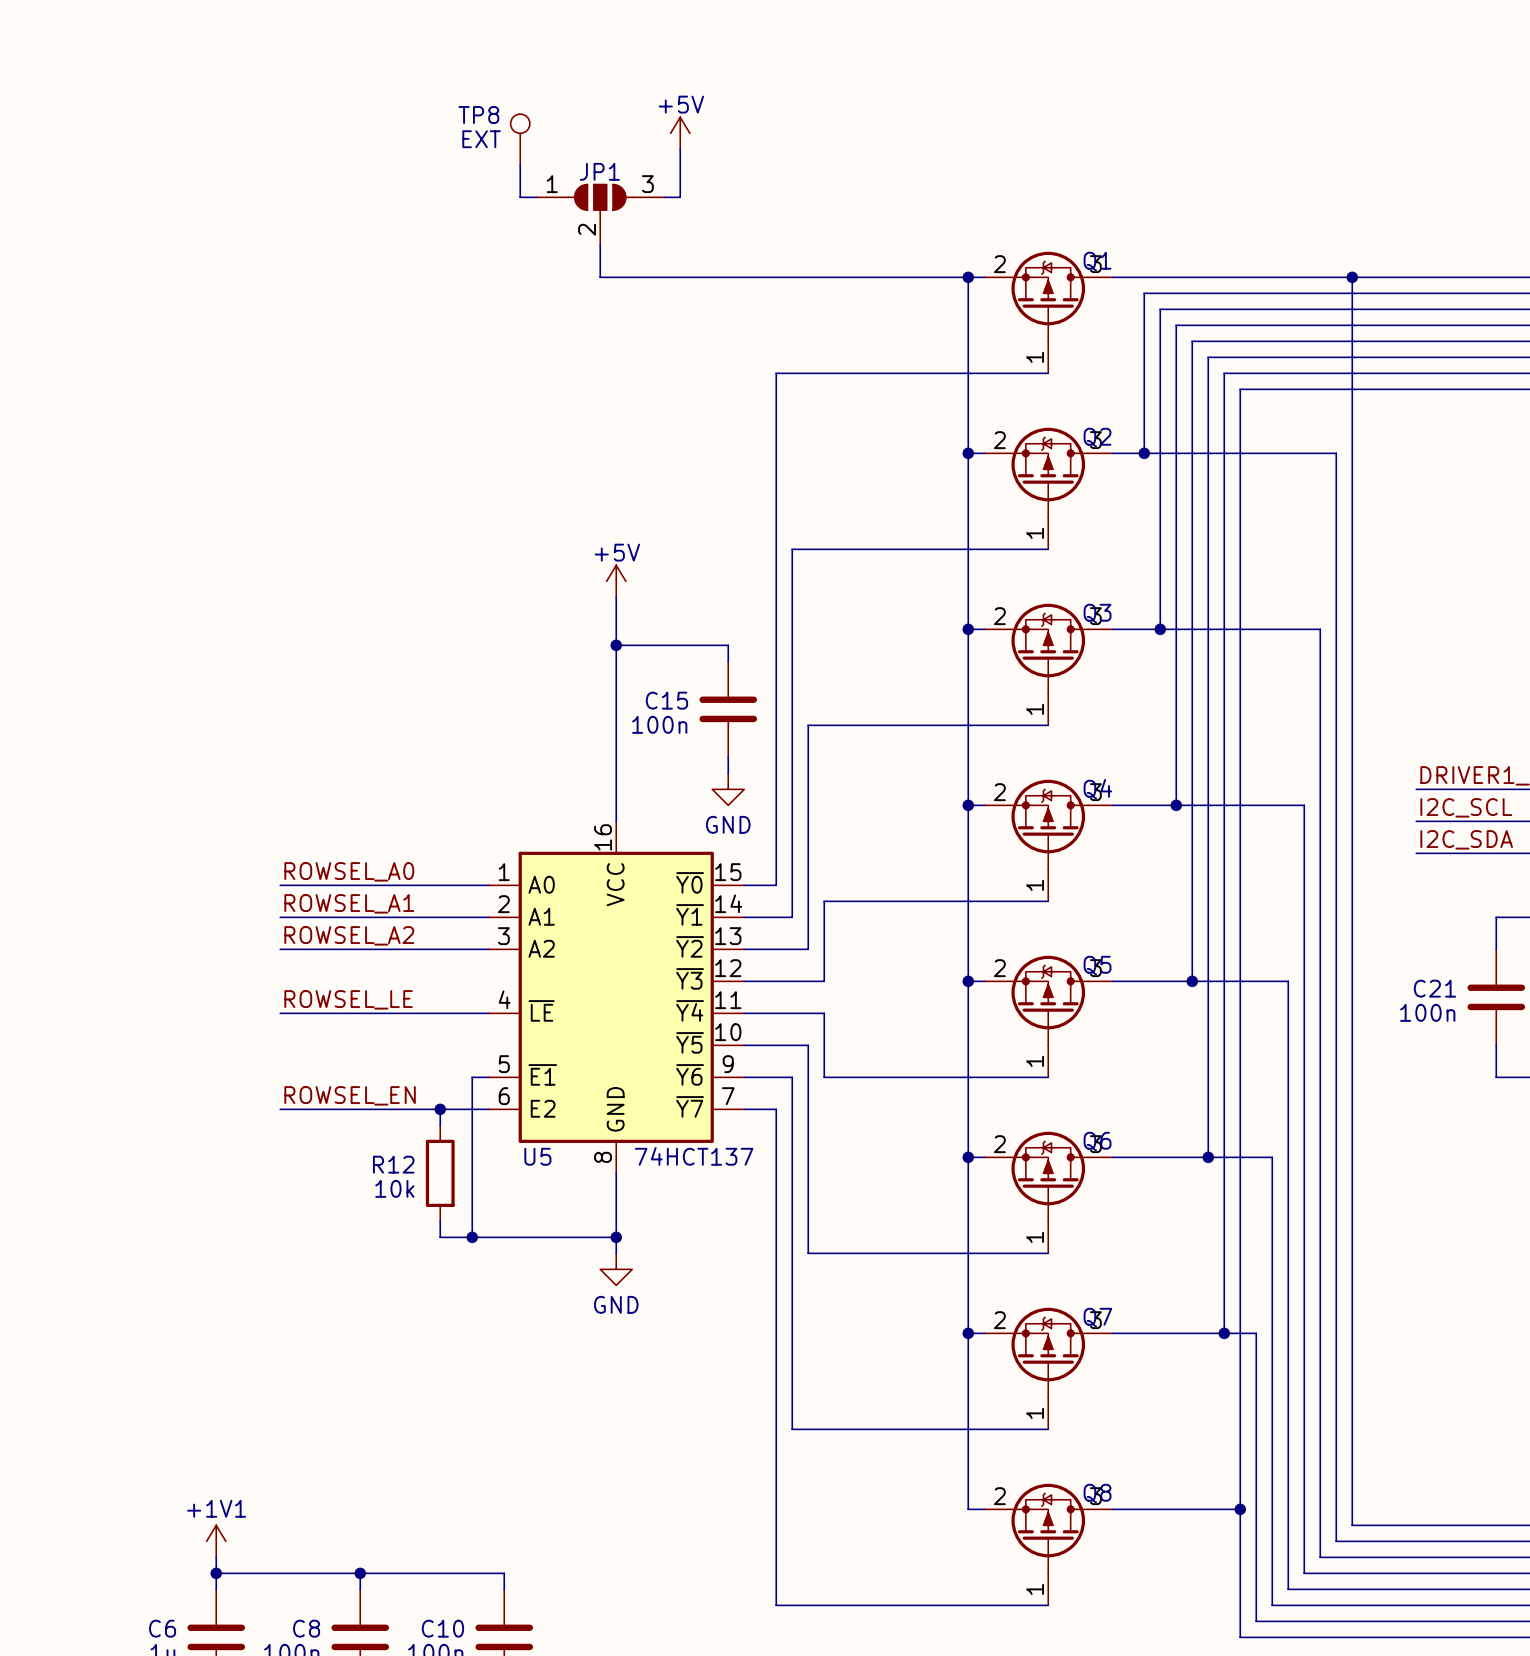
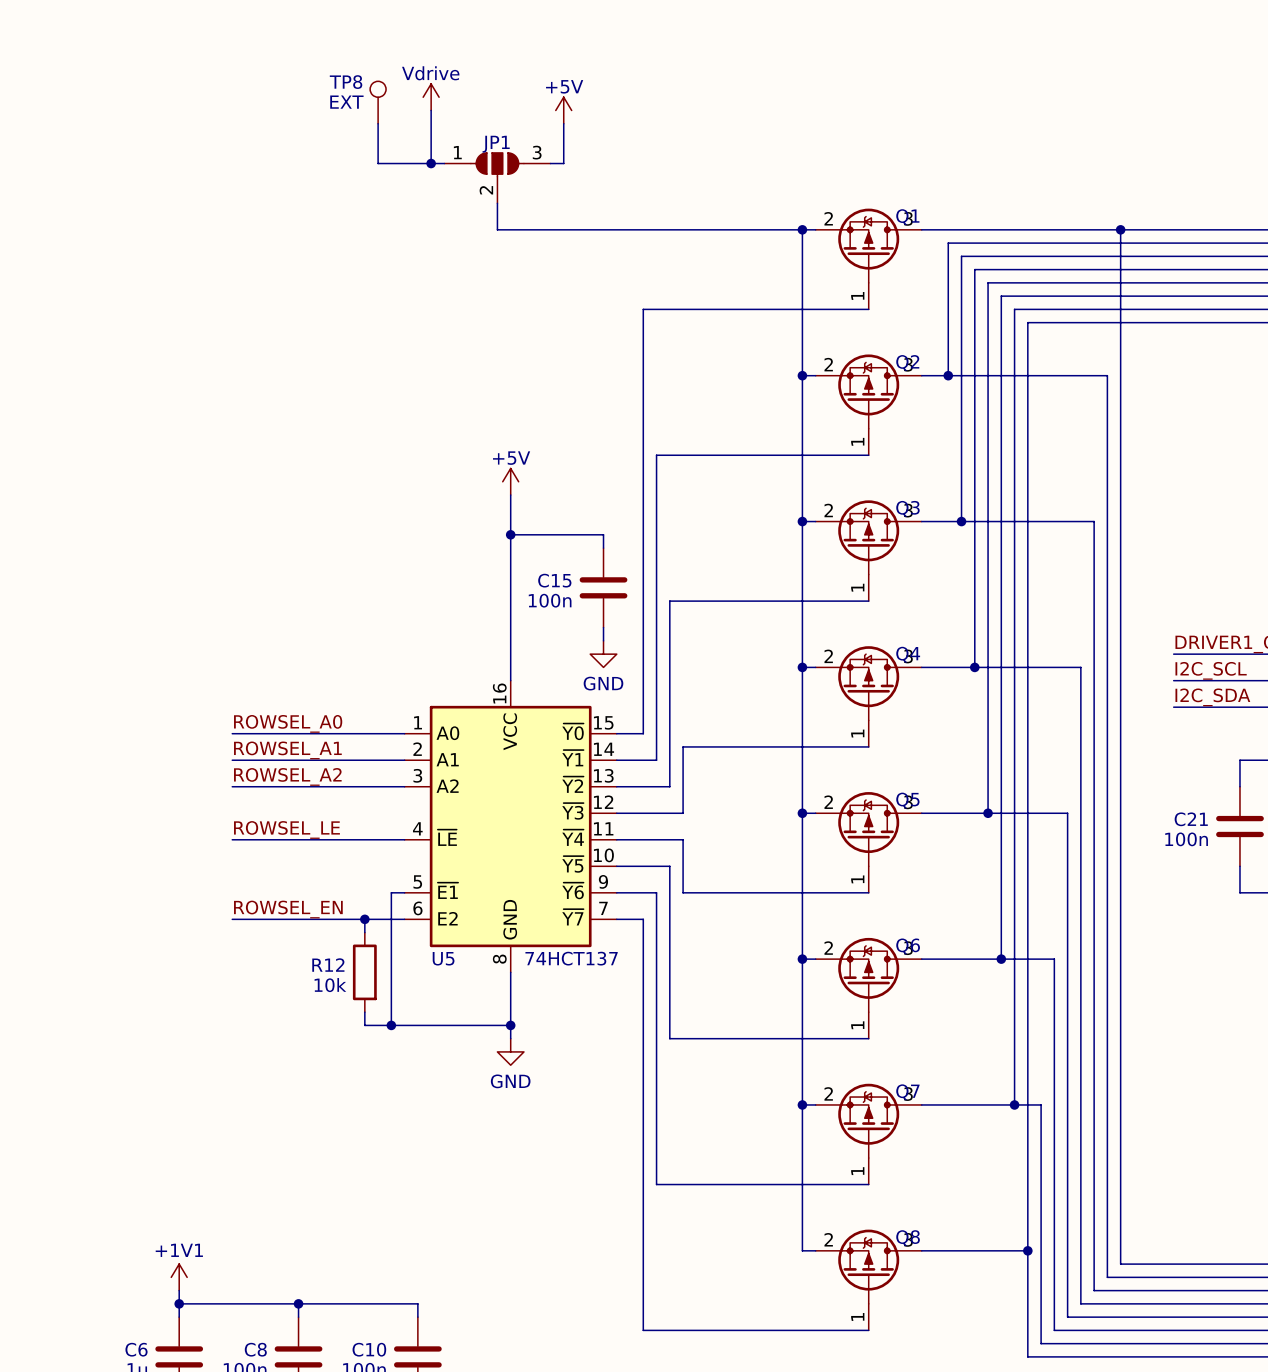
power symbol: none -> Vdrive (431, 97)
TP8 position: (520, 139) -> (378, 102)
wire: none -> (378, 123) (378, 163) (431, 163)
junction: none -> (431, 163)

